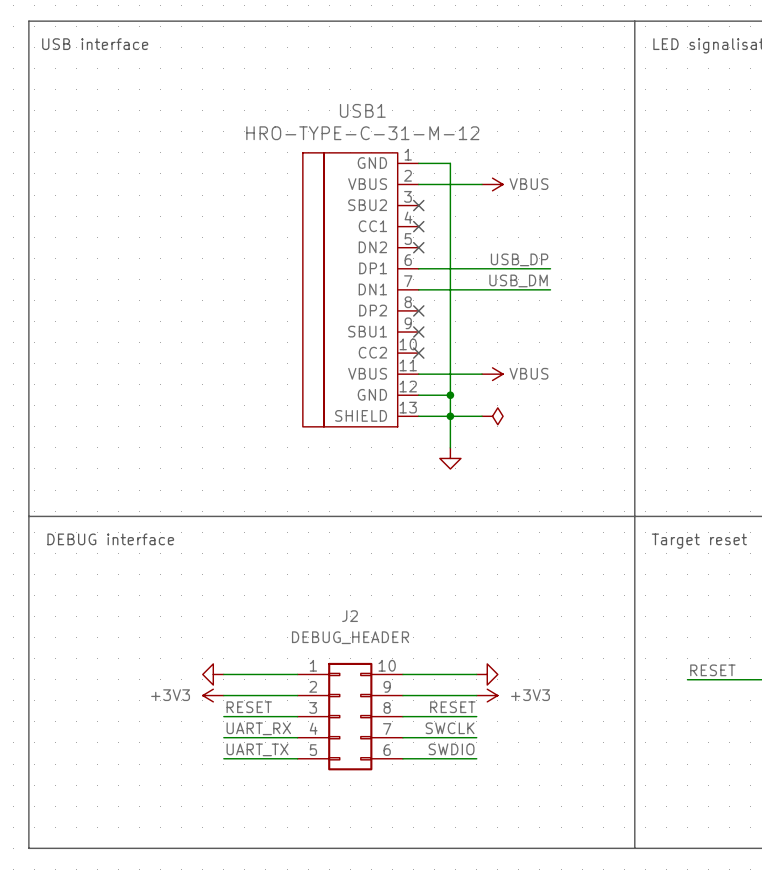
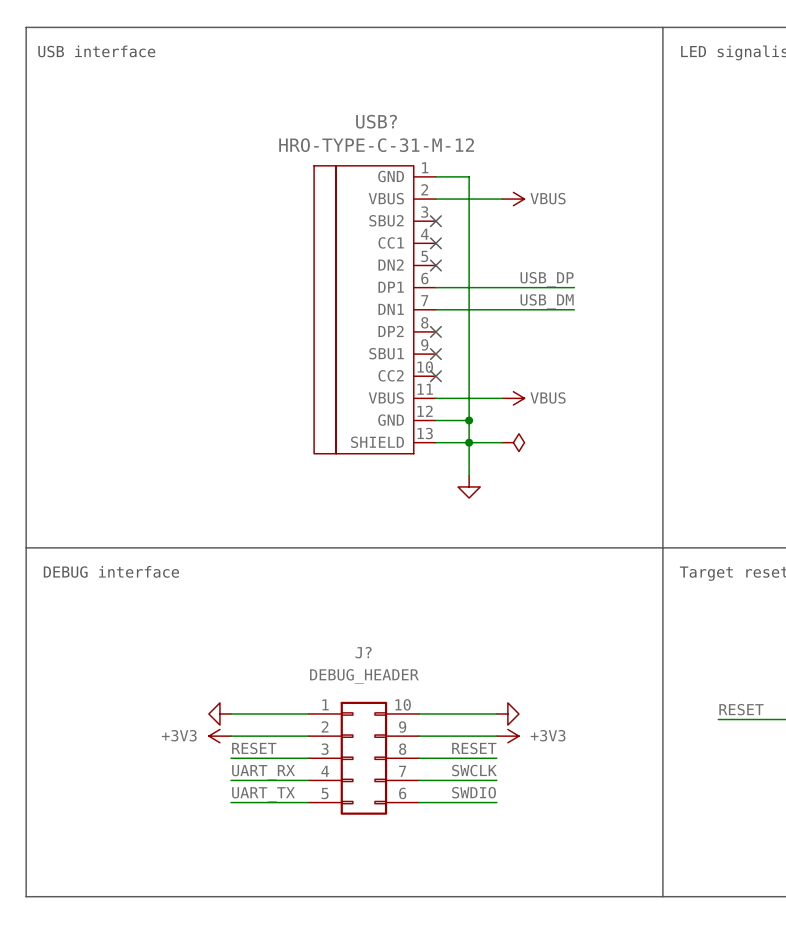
USB1 name: USB1 (362, 110) -> USB? (376, 121)
J2 name: J2 (350, 616) -> J? (363, 652)

